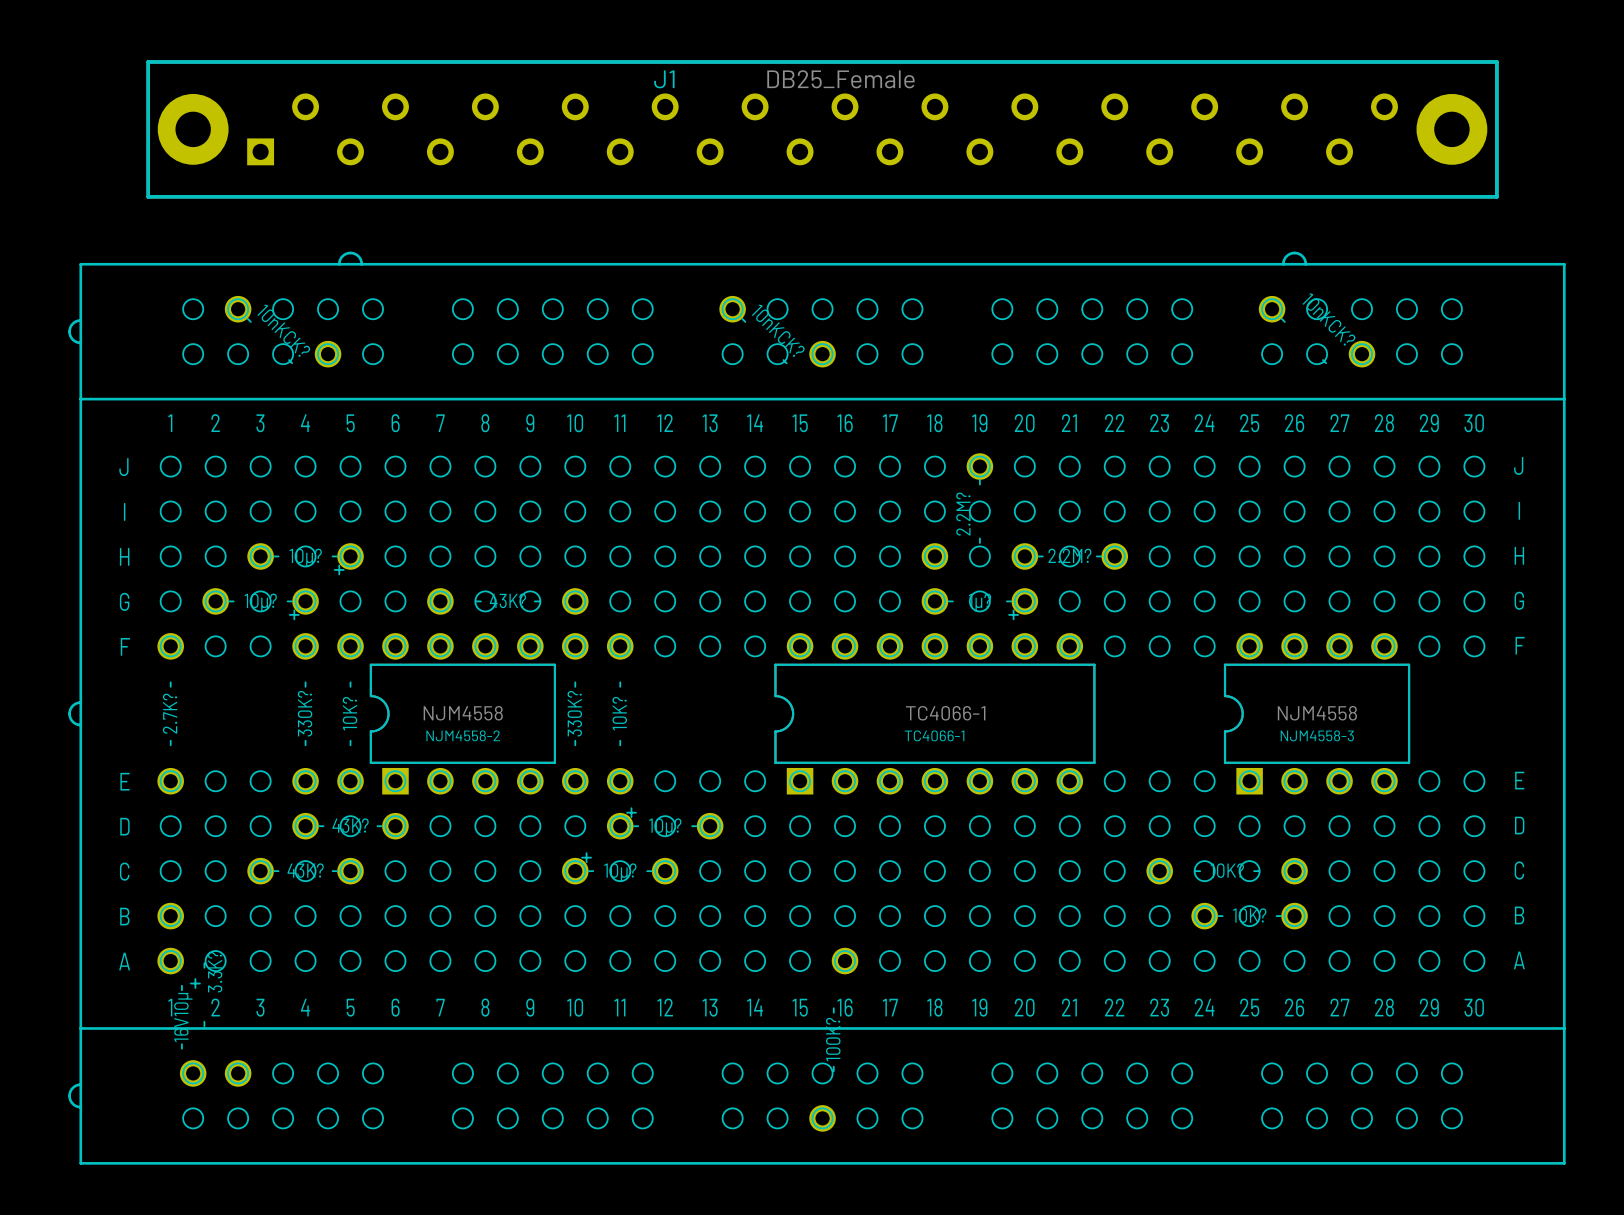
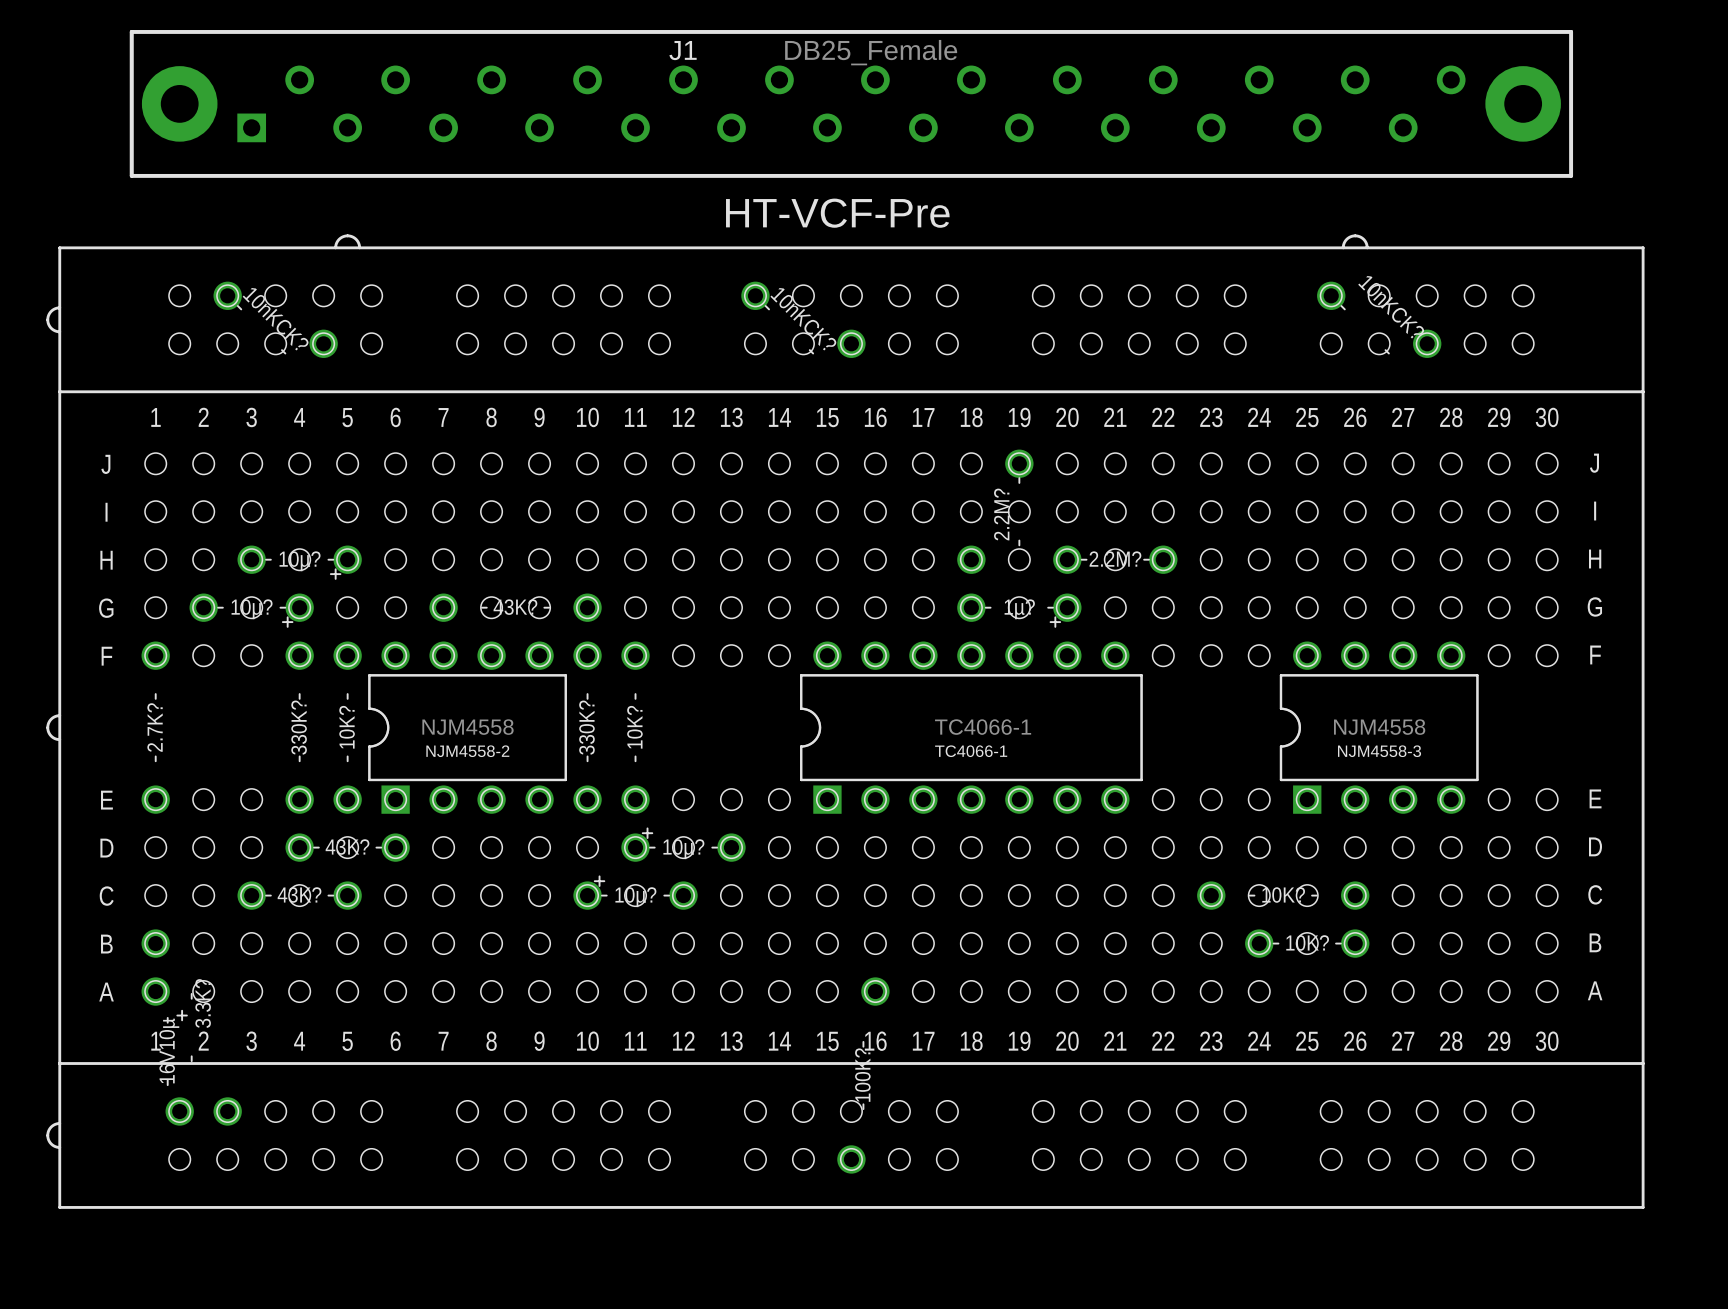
text: none -> HT-VCF-Pre (837, 213)

